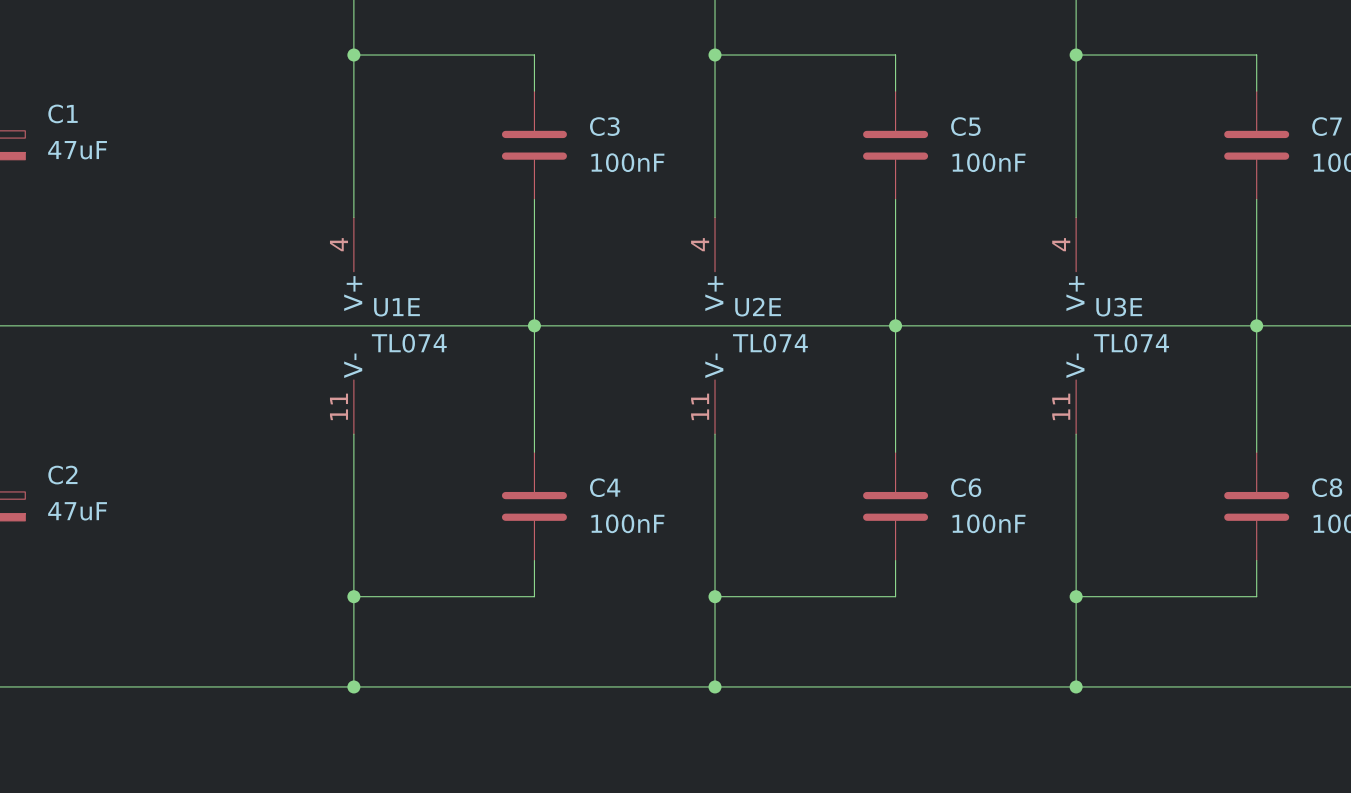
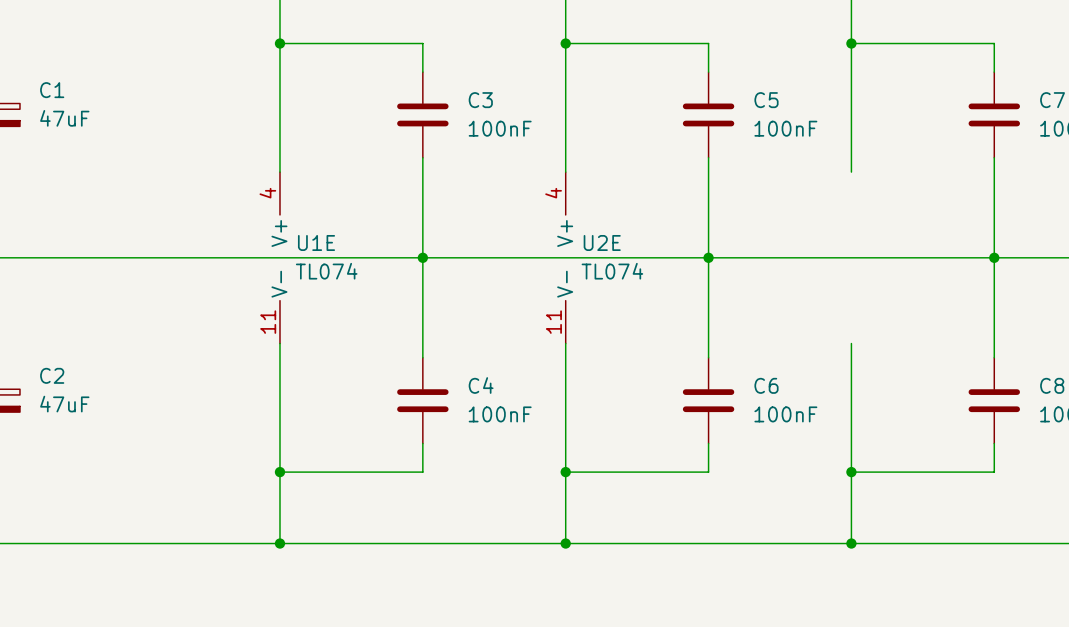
U3E: TL074 (1076, 325) -> none

